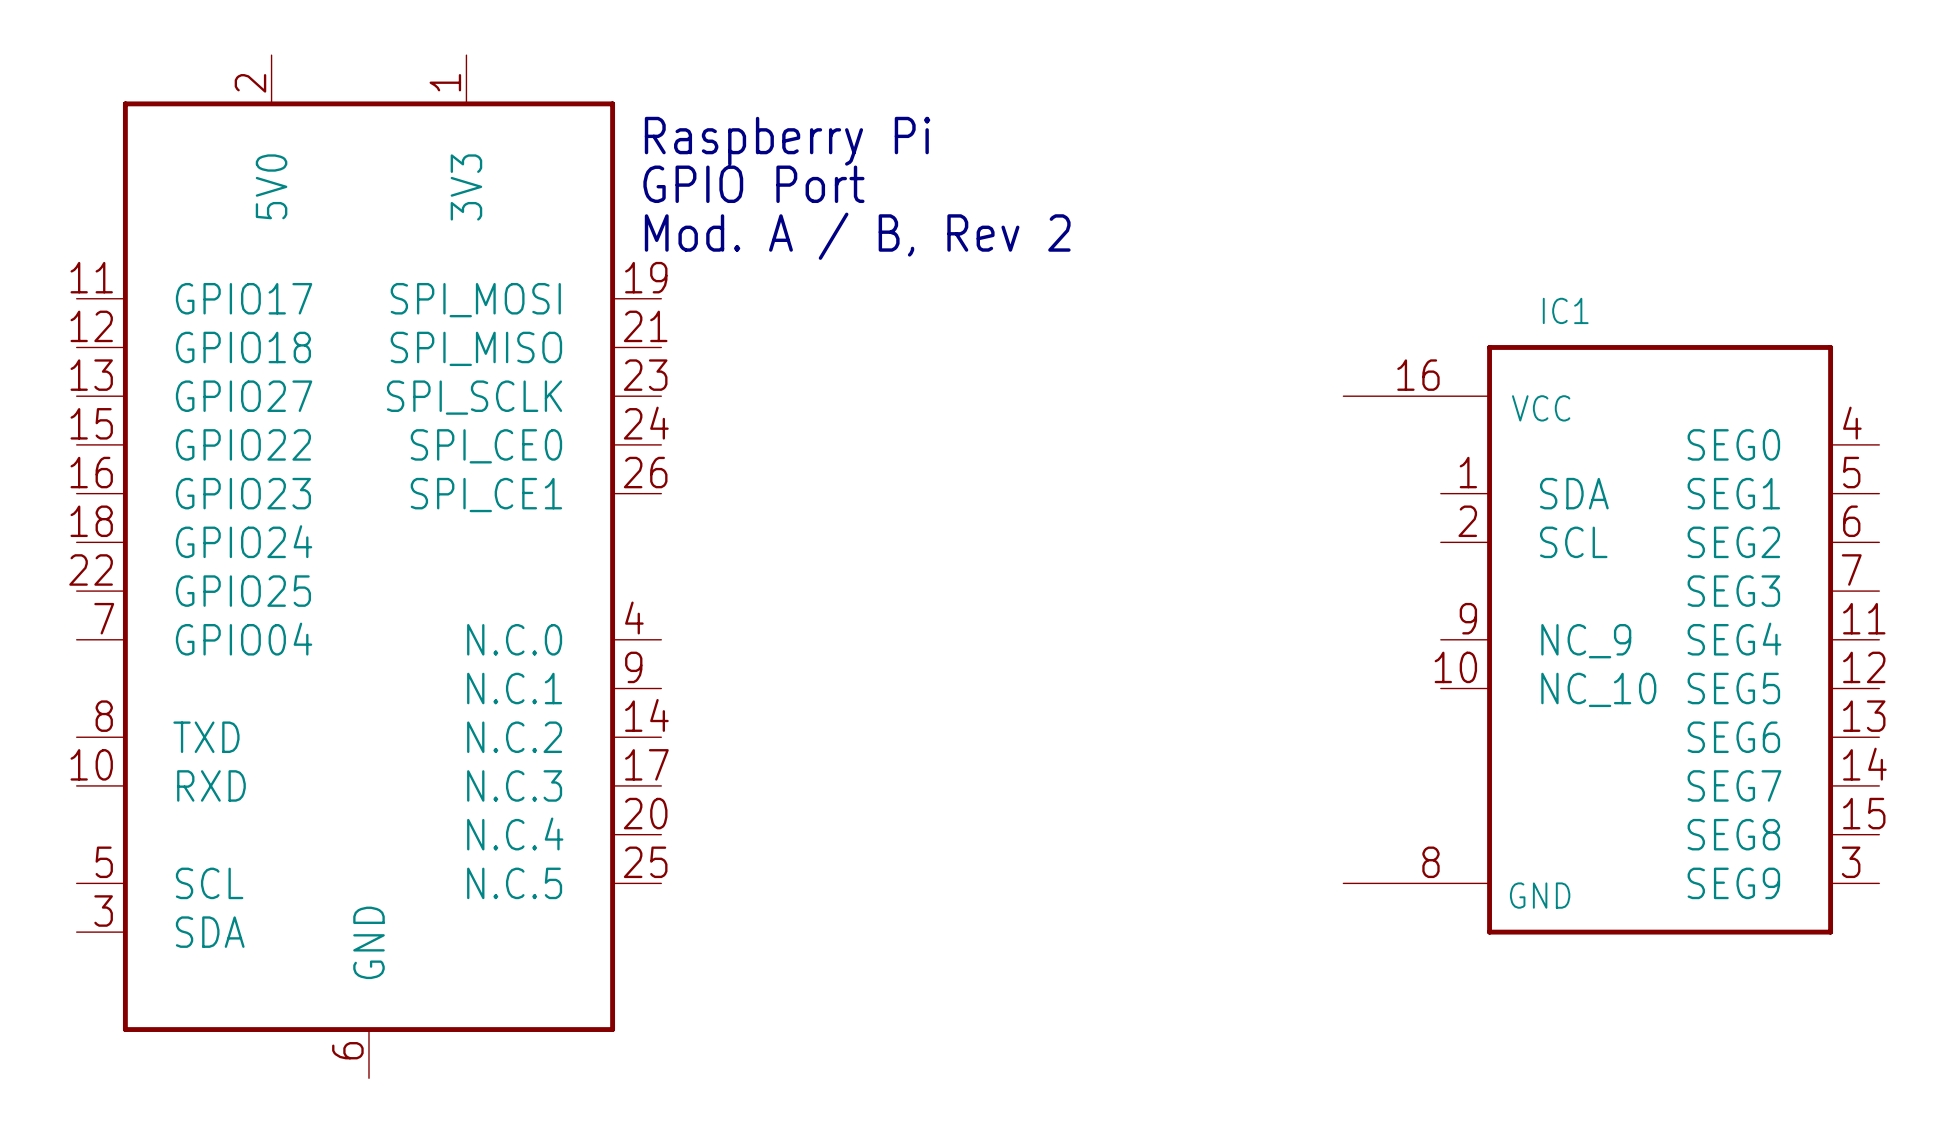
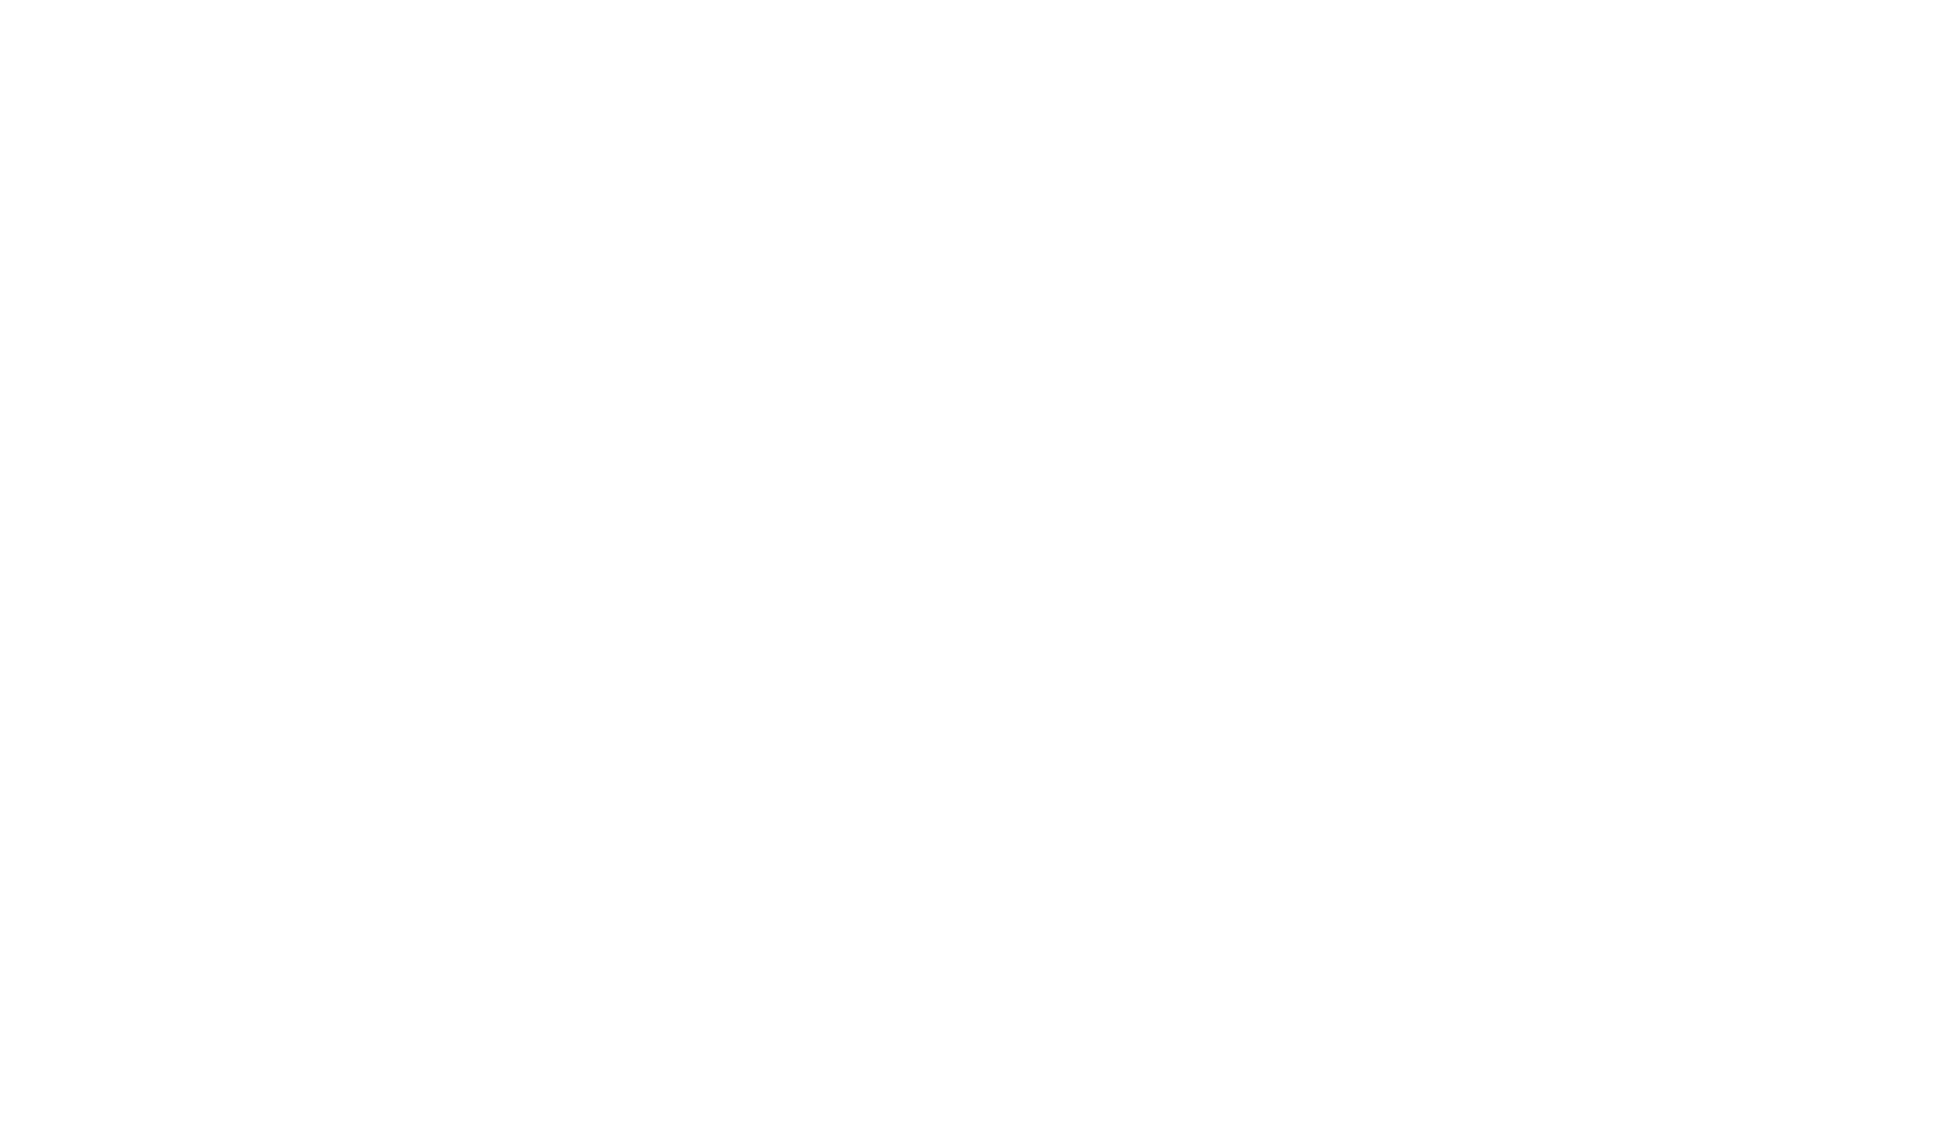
part: (368, 566) -> none
IC1: (1611, 639) -> none

